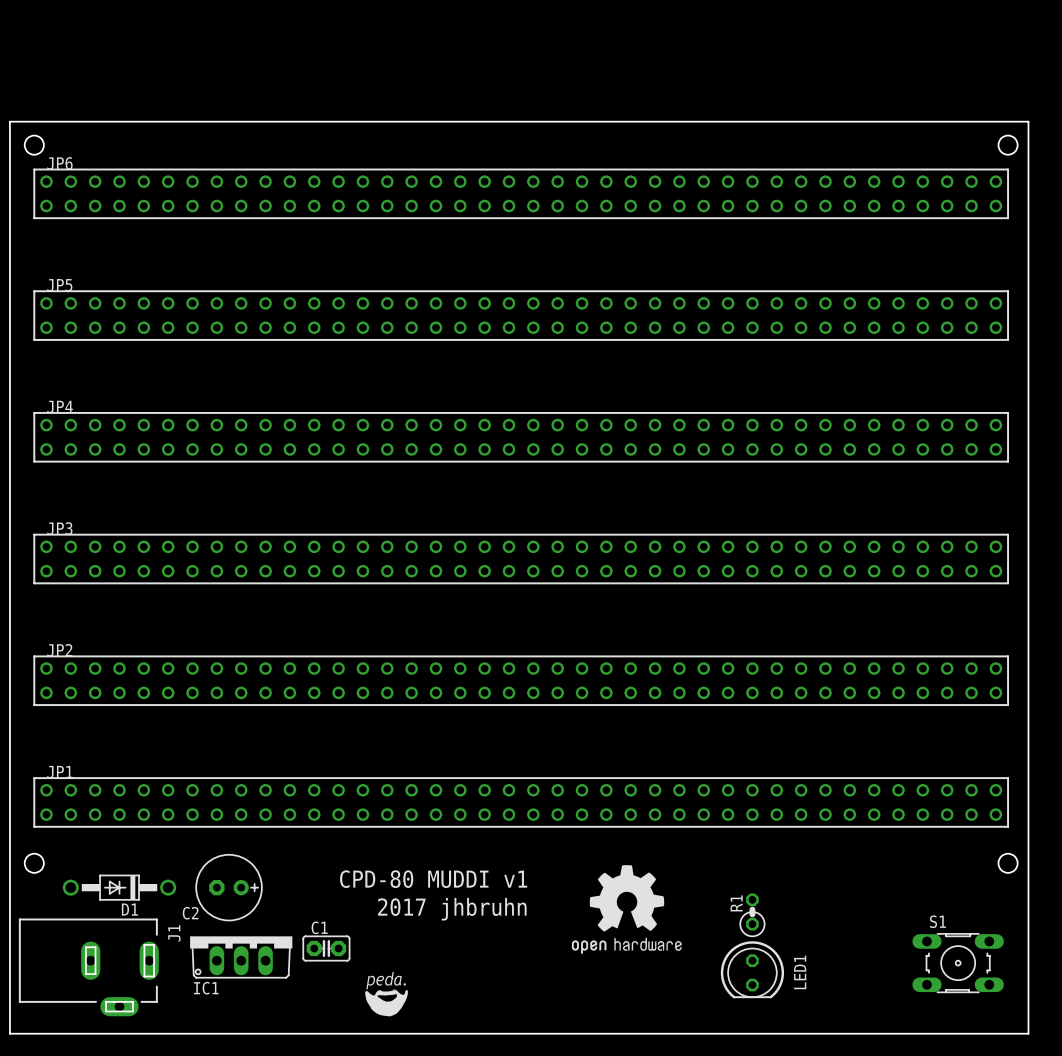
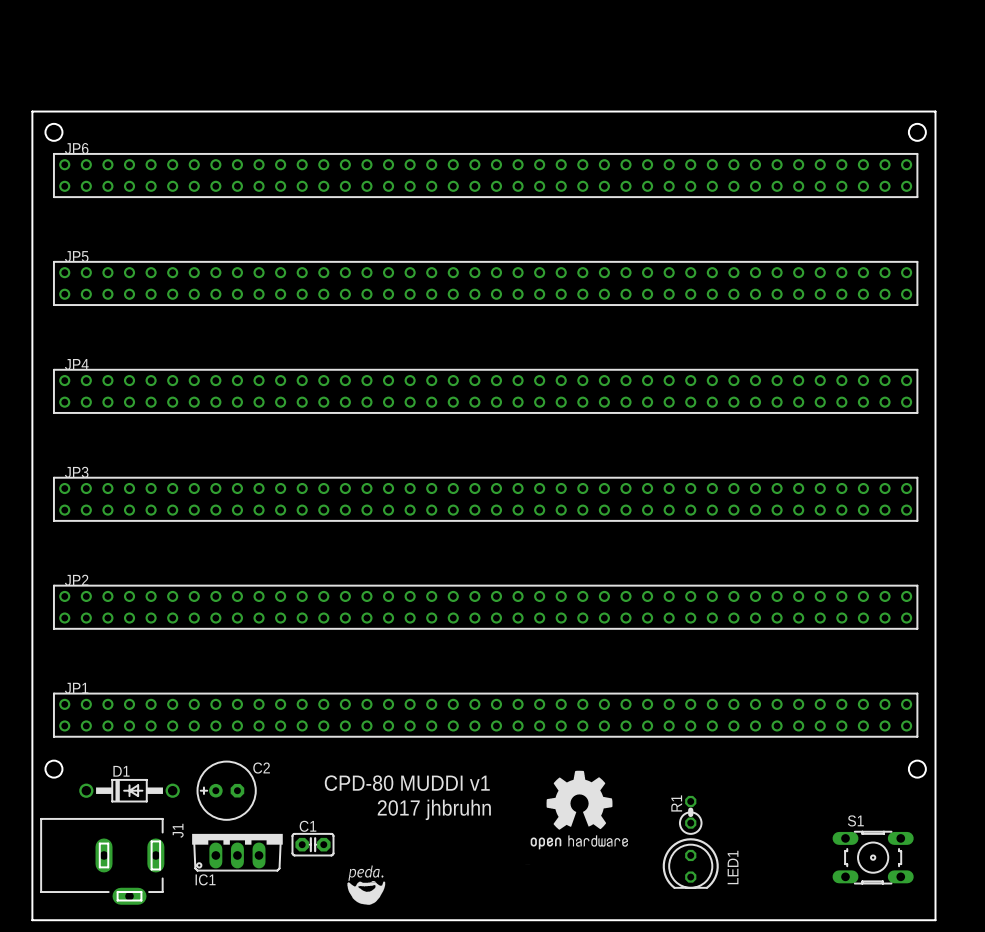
D1 rotation: 0° (119, 887) -> 180° (129, 790)
C2 rotation: 0° (229, 887) -> 180° (226, 790)

